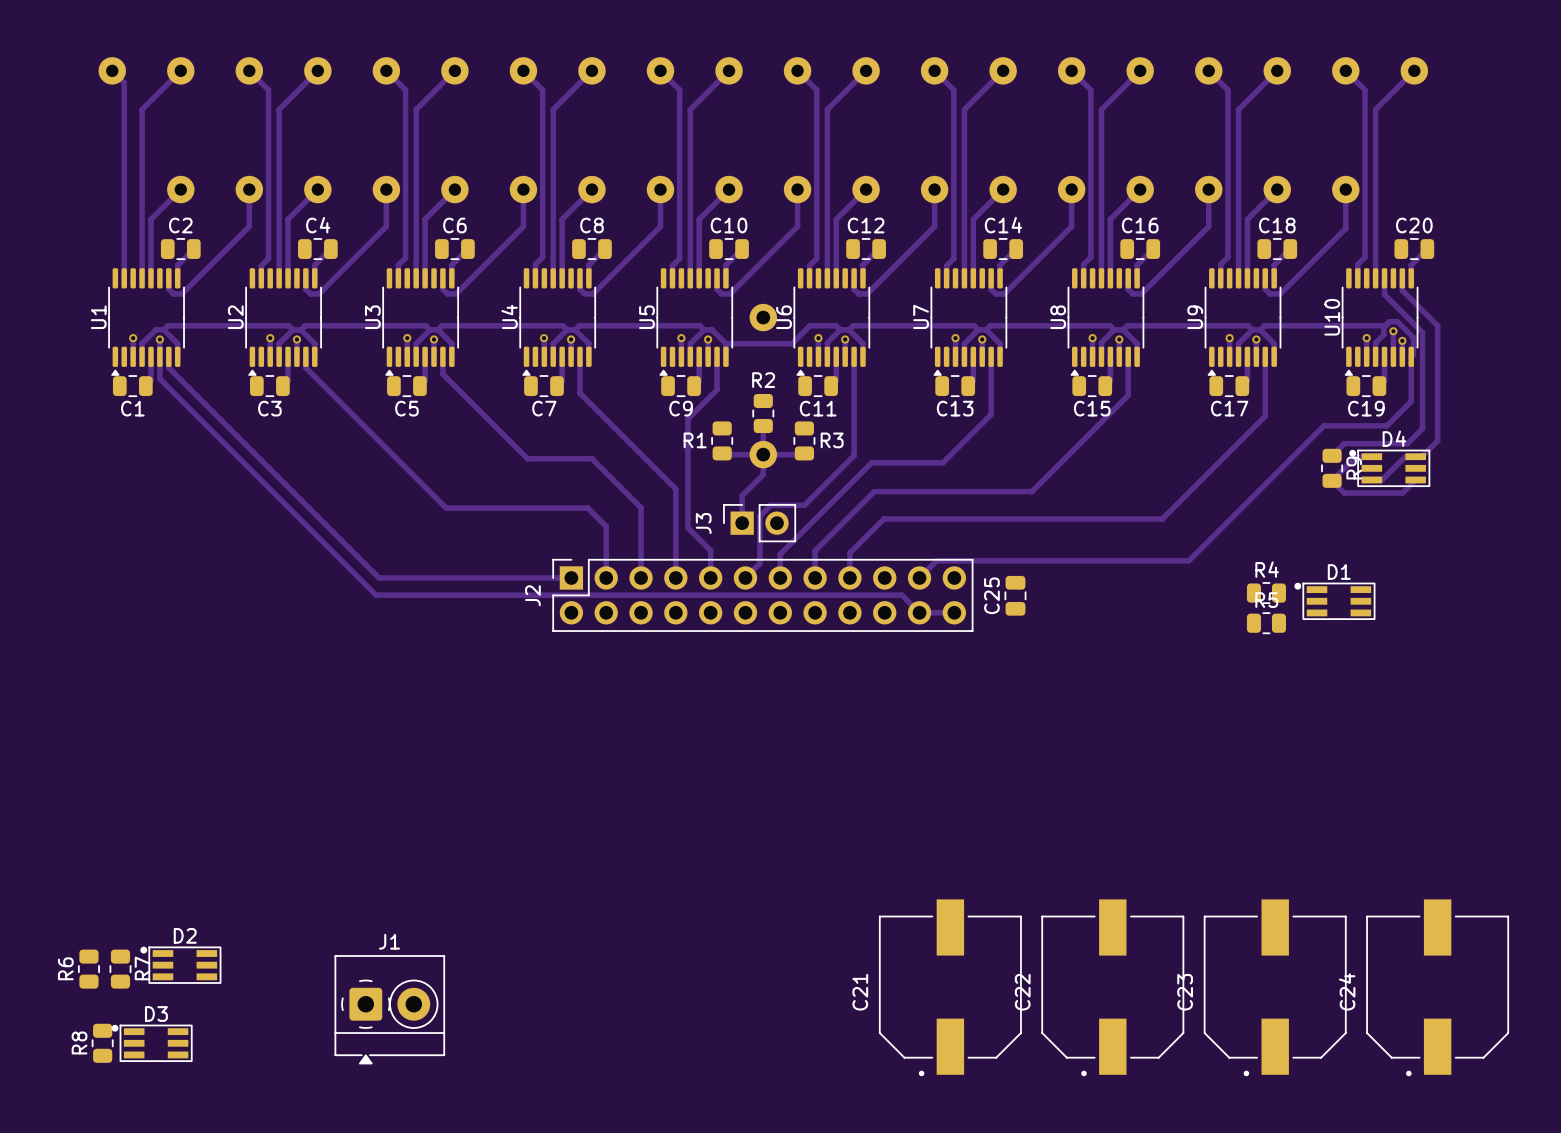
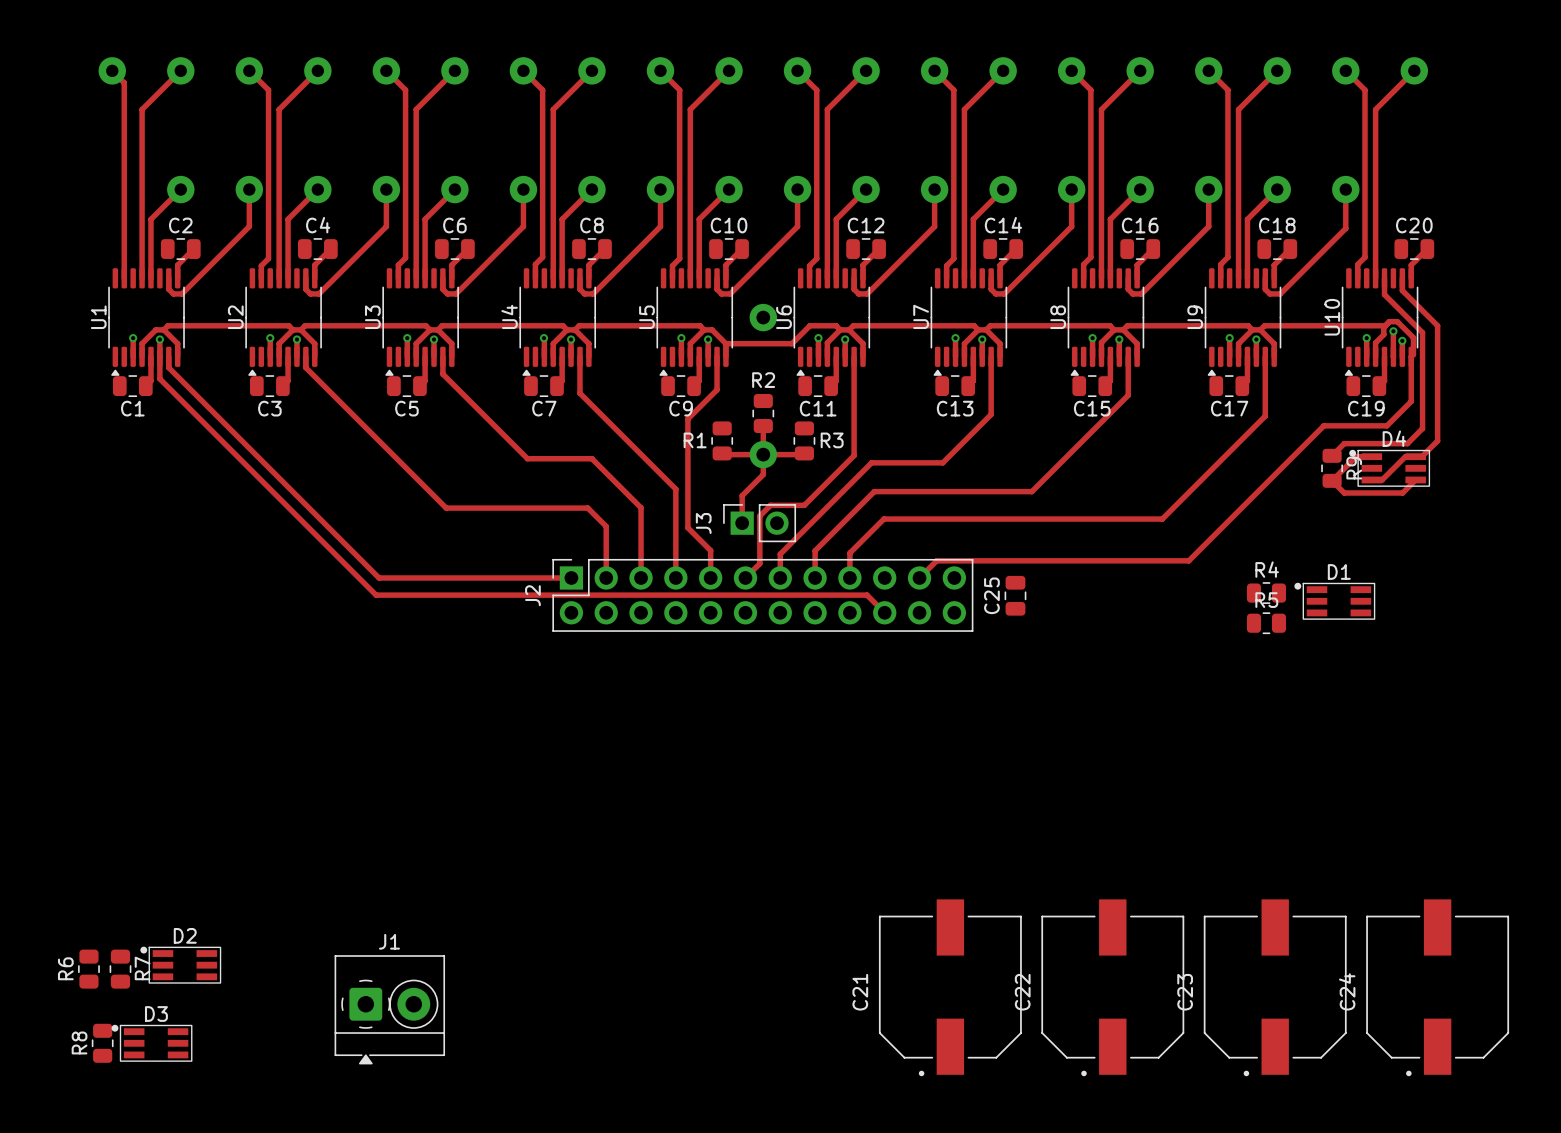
track: (867, 595) (901, 595) (919, 612) (954, 612) -> (867, 595) (884, 612)

